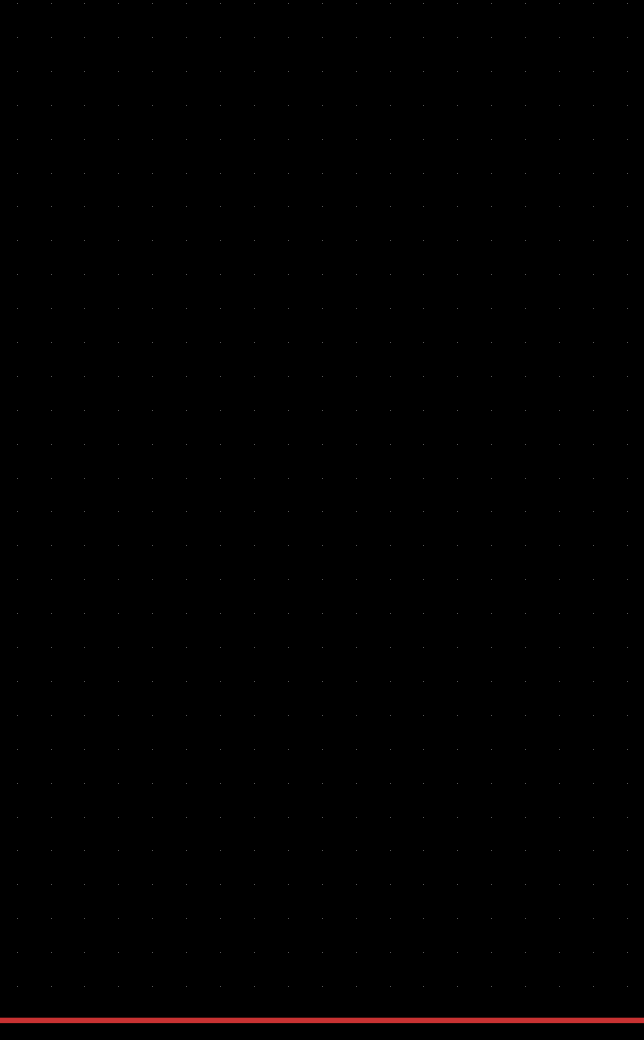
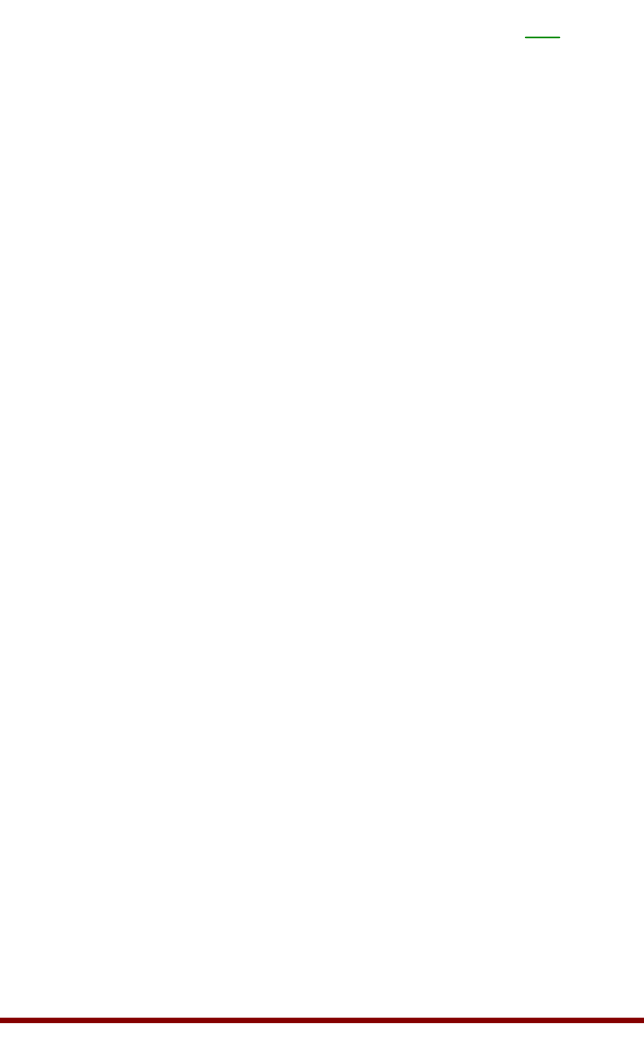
wire: none -> (525, 37) (559, 37)

